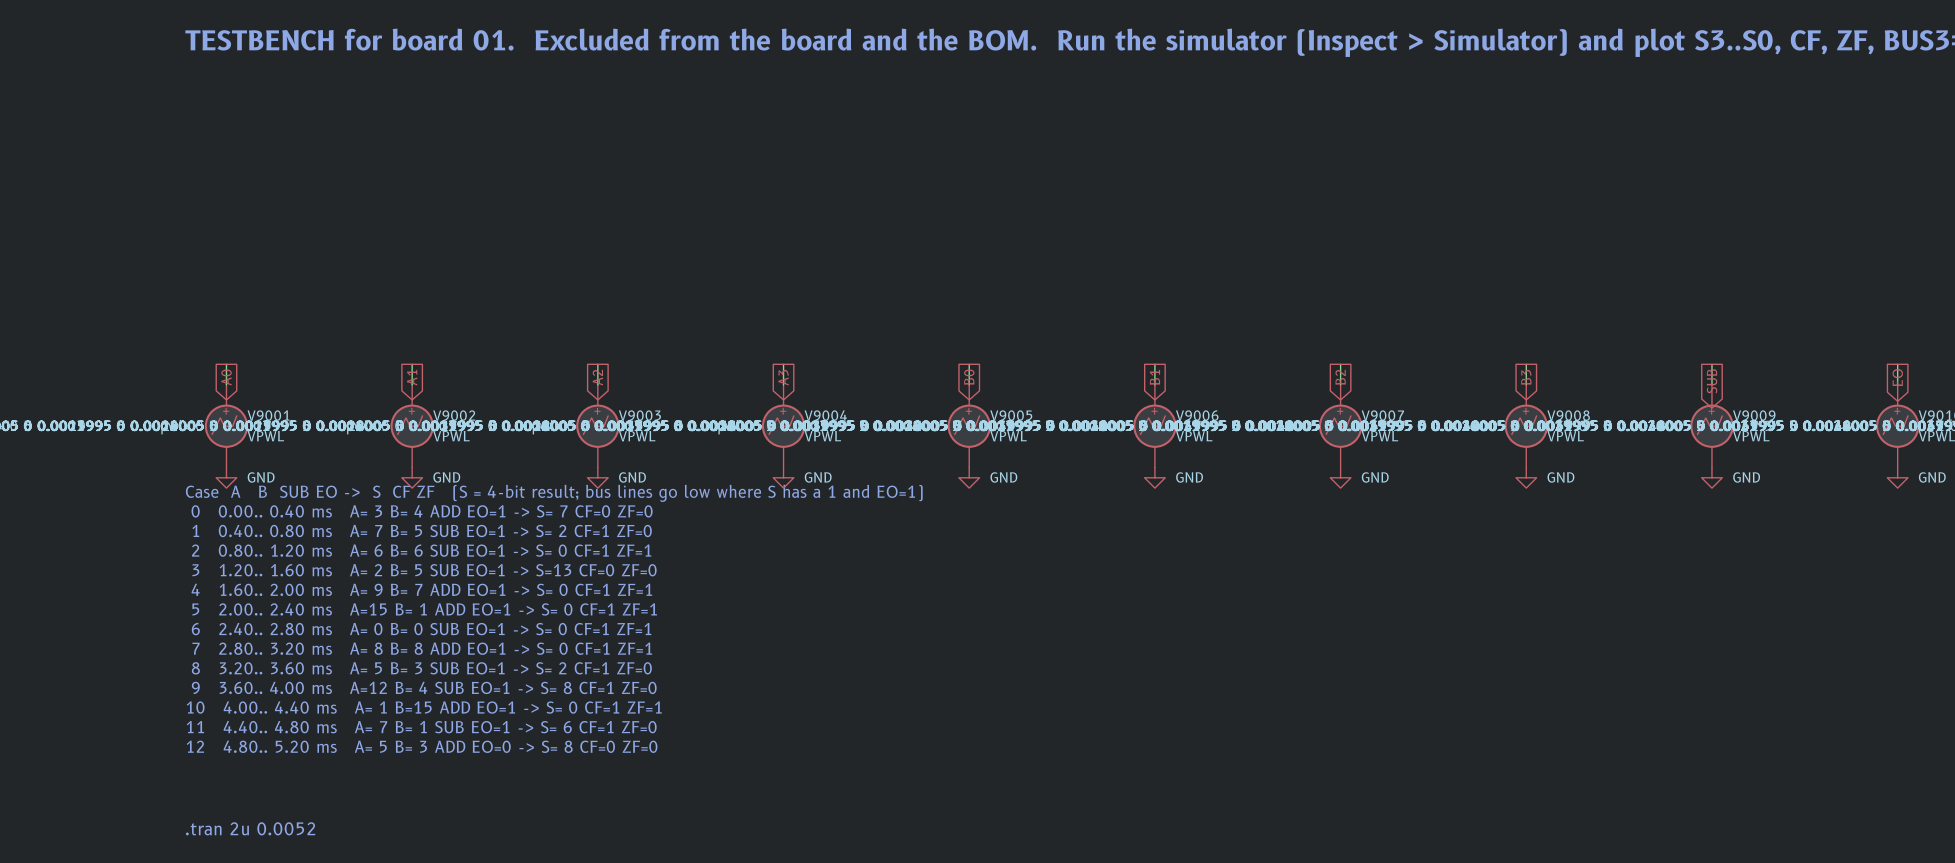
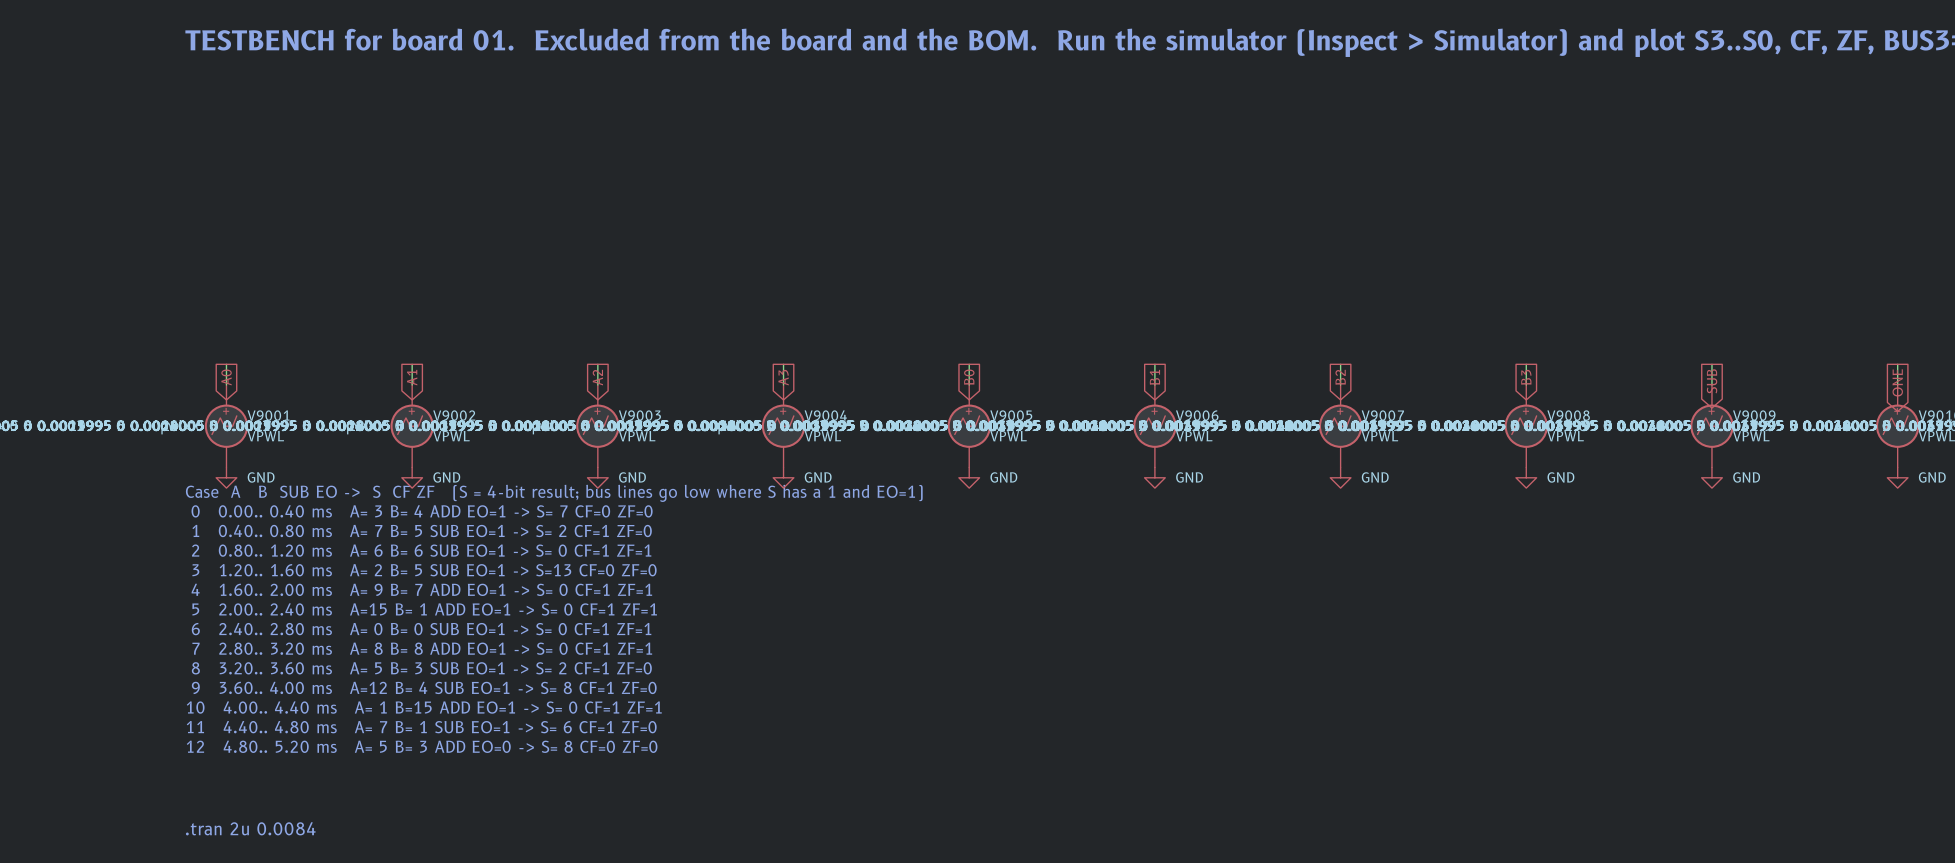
global label: EO (1897, 377) -> ONE (1897, 382)
text: .tran 2u 0.0052 (250, 828) -> .tran 2u 0.0084 (250, 828)

